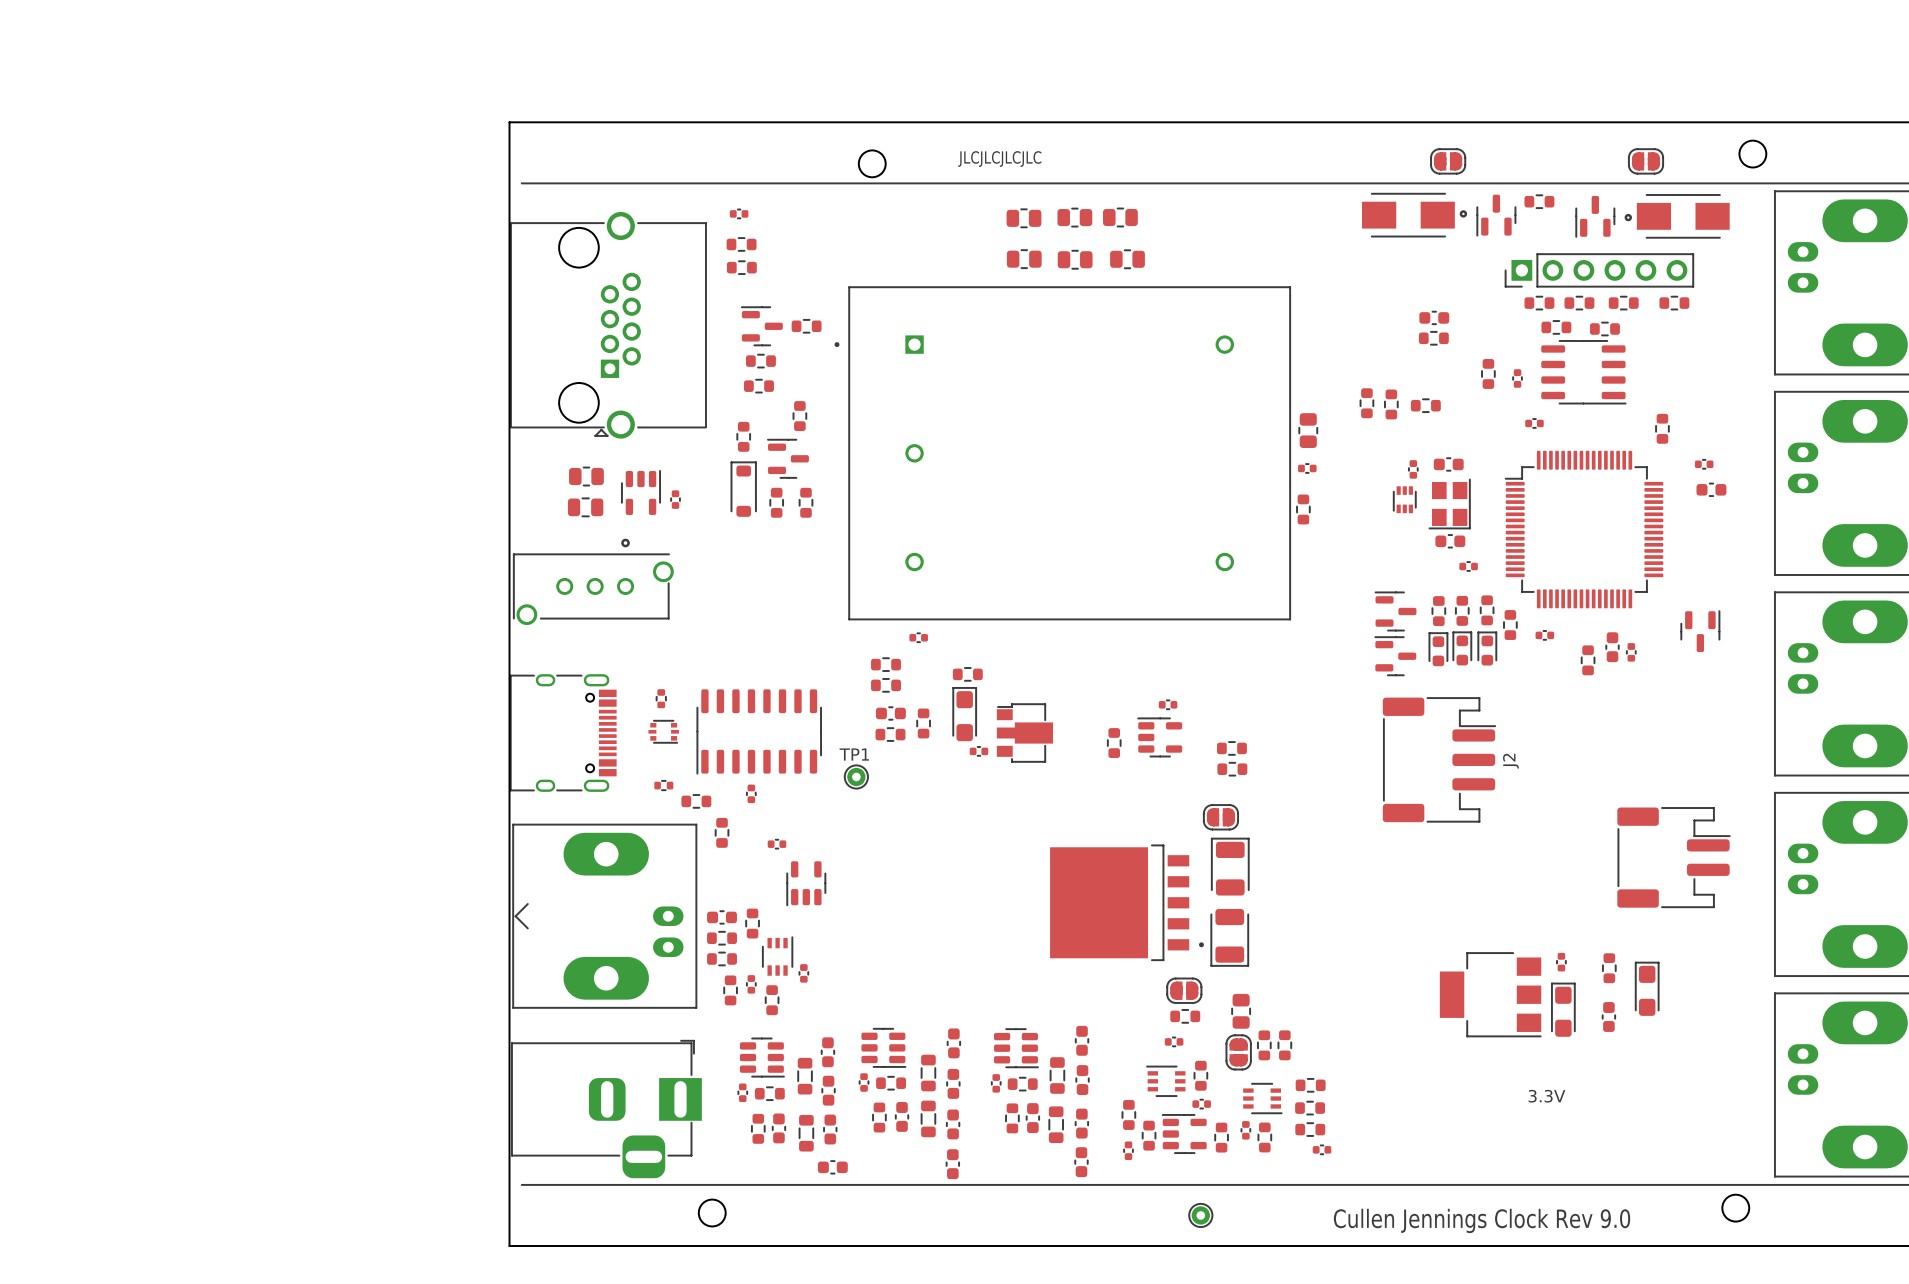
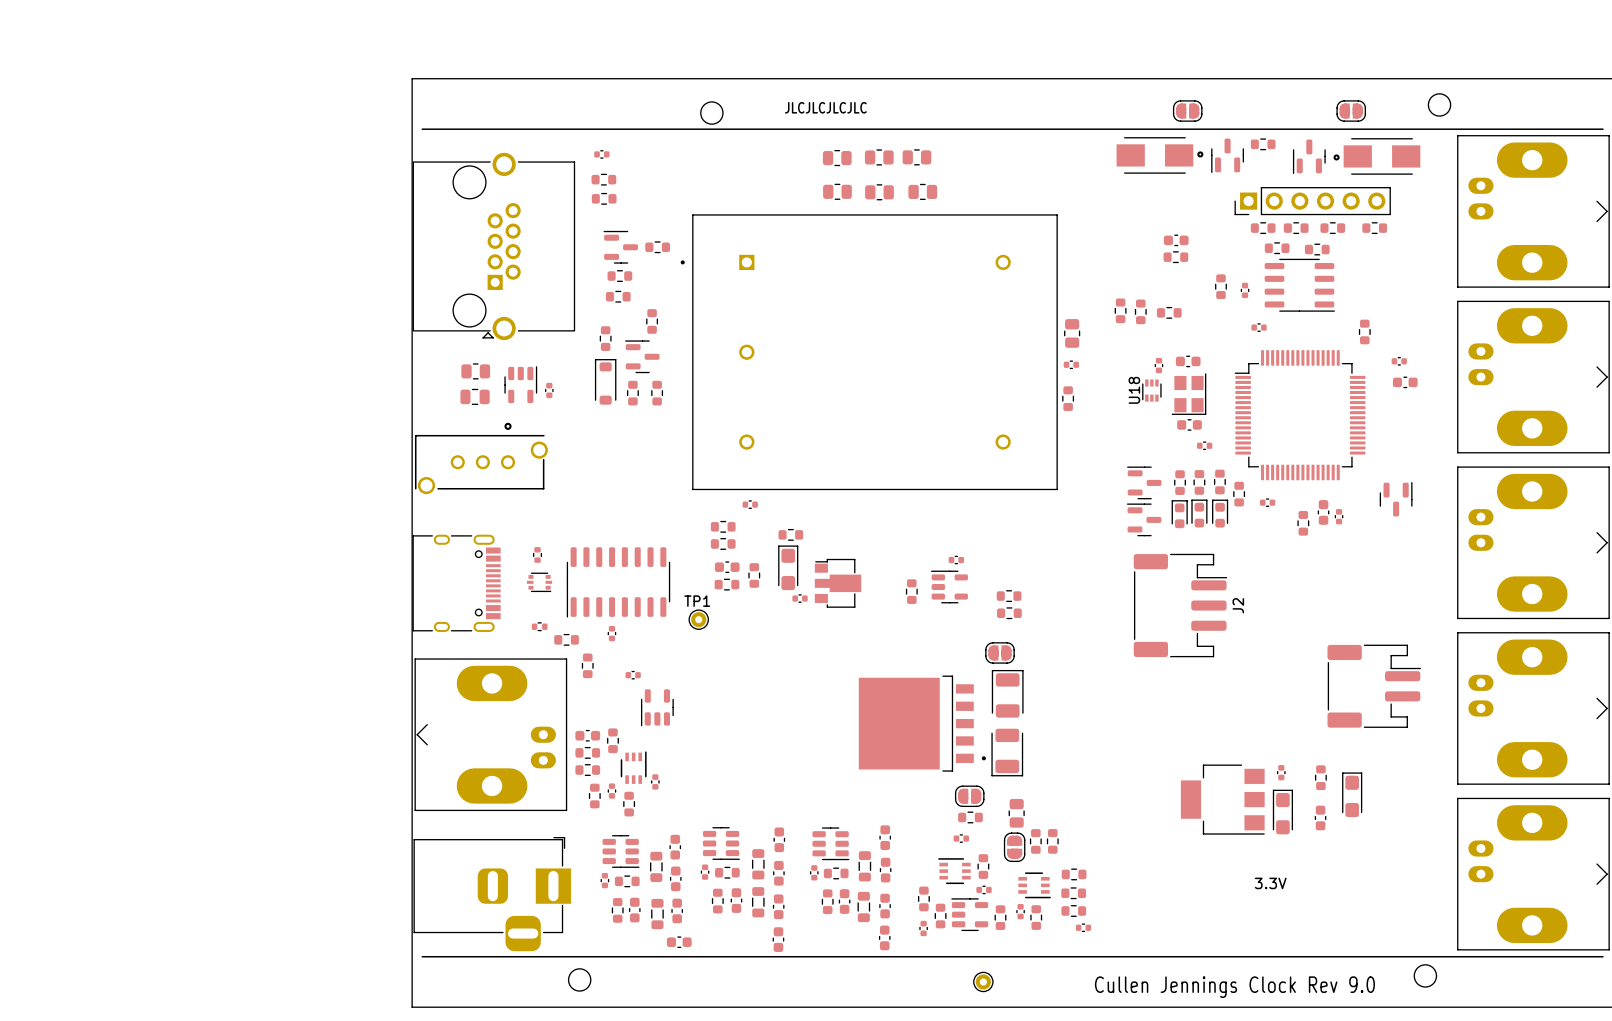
U18 name: none -> U18 (1134, 390)

